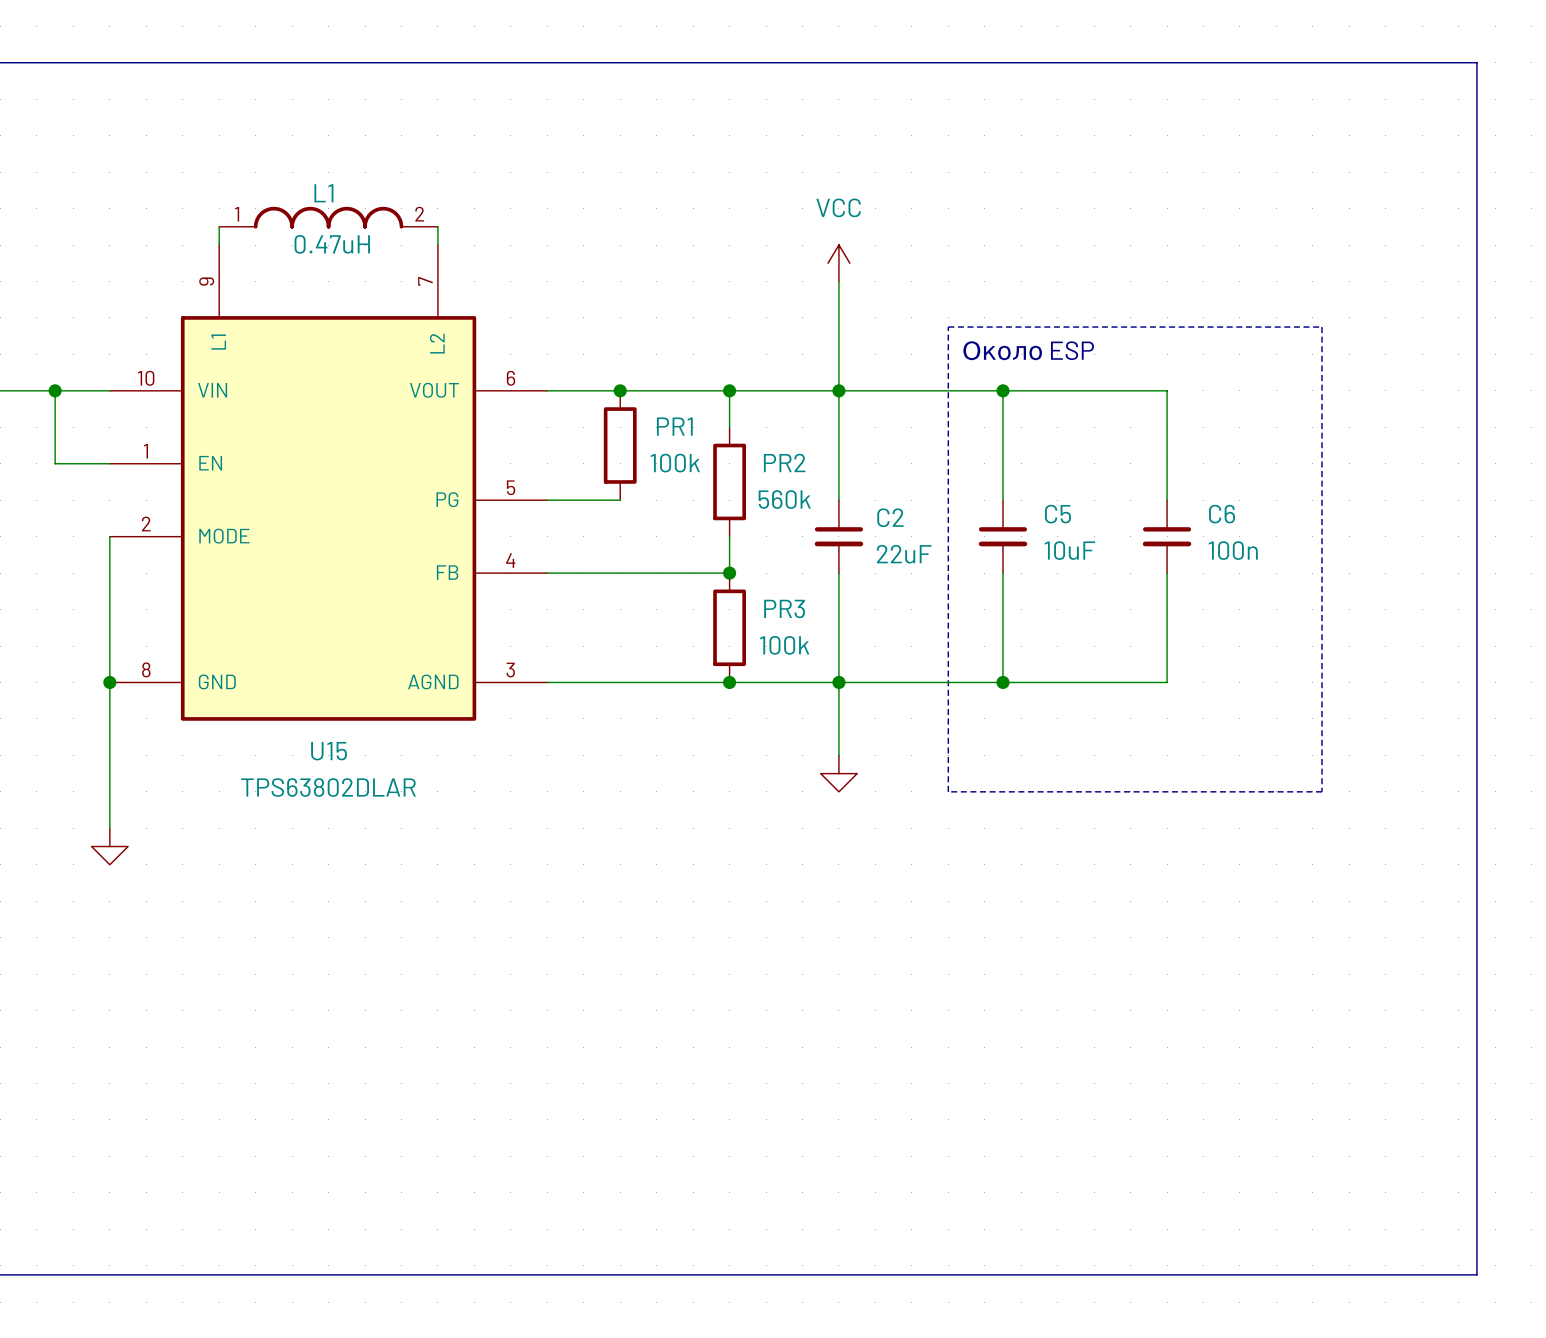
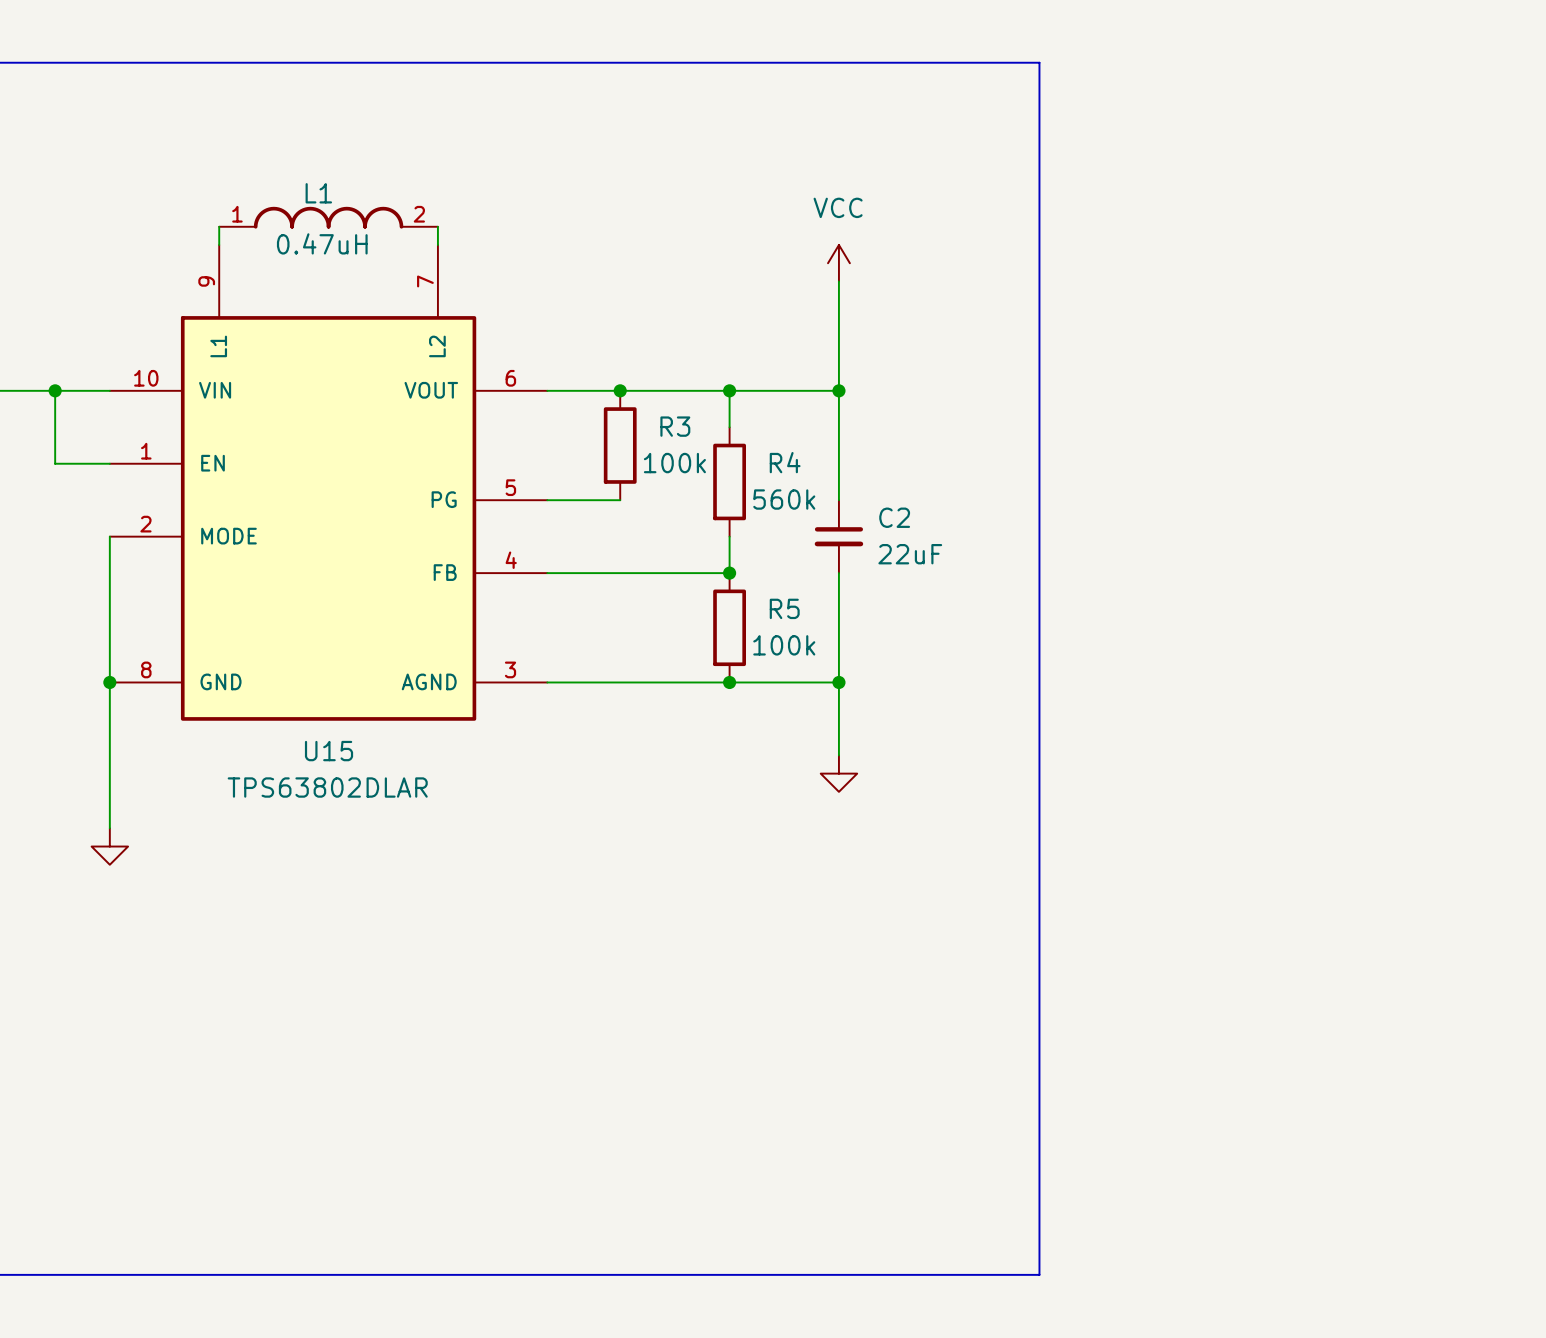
line: (1039, 62) (1476, 62) (1476, 1274) (1039, 1274) -> (1039, 62) (1039, 1274)
line: (948, 327) (1321, 327) (1321, 791) (948, 791) (948, 327) -> none
text: Около ESP (1028, 350) -> none
wire: (838, 390) (1167, 390) (1167, 500) -> none
wire: (1003, 390) (1003, 500) -> none
junction: (1003, 390) -> none
PR1 name: PR1 (674, 426) -> R3 (675, 426)
PR2 name: PR2 (784, 462) -> R4 (785, 462)
C5: 10uF (1003, 536) -> none
C6: 100n (1167, 536) -> none
wire: (1003, 573) (1003, 682) -> none
wire: (1167, 573) (1167, 682) (838, 682) -> none
PR3 name: PR3 (784, 608) -> R5 (784, 608)
junction: (1003, 682) -> none

